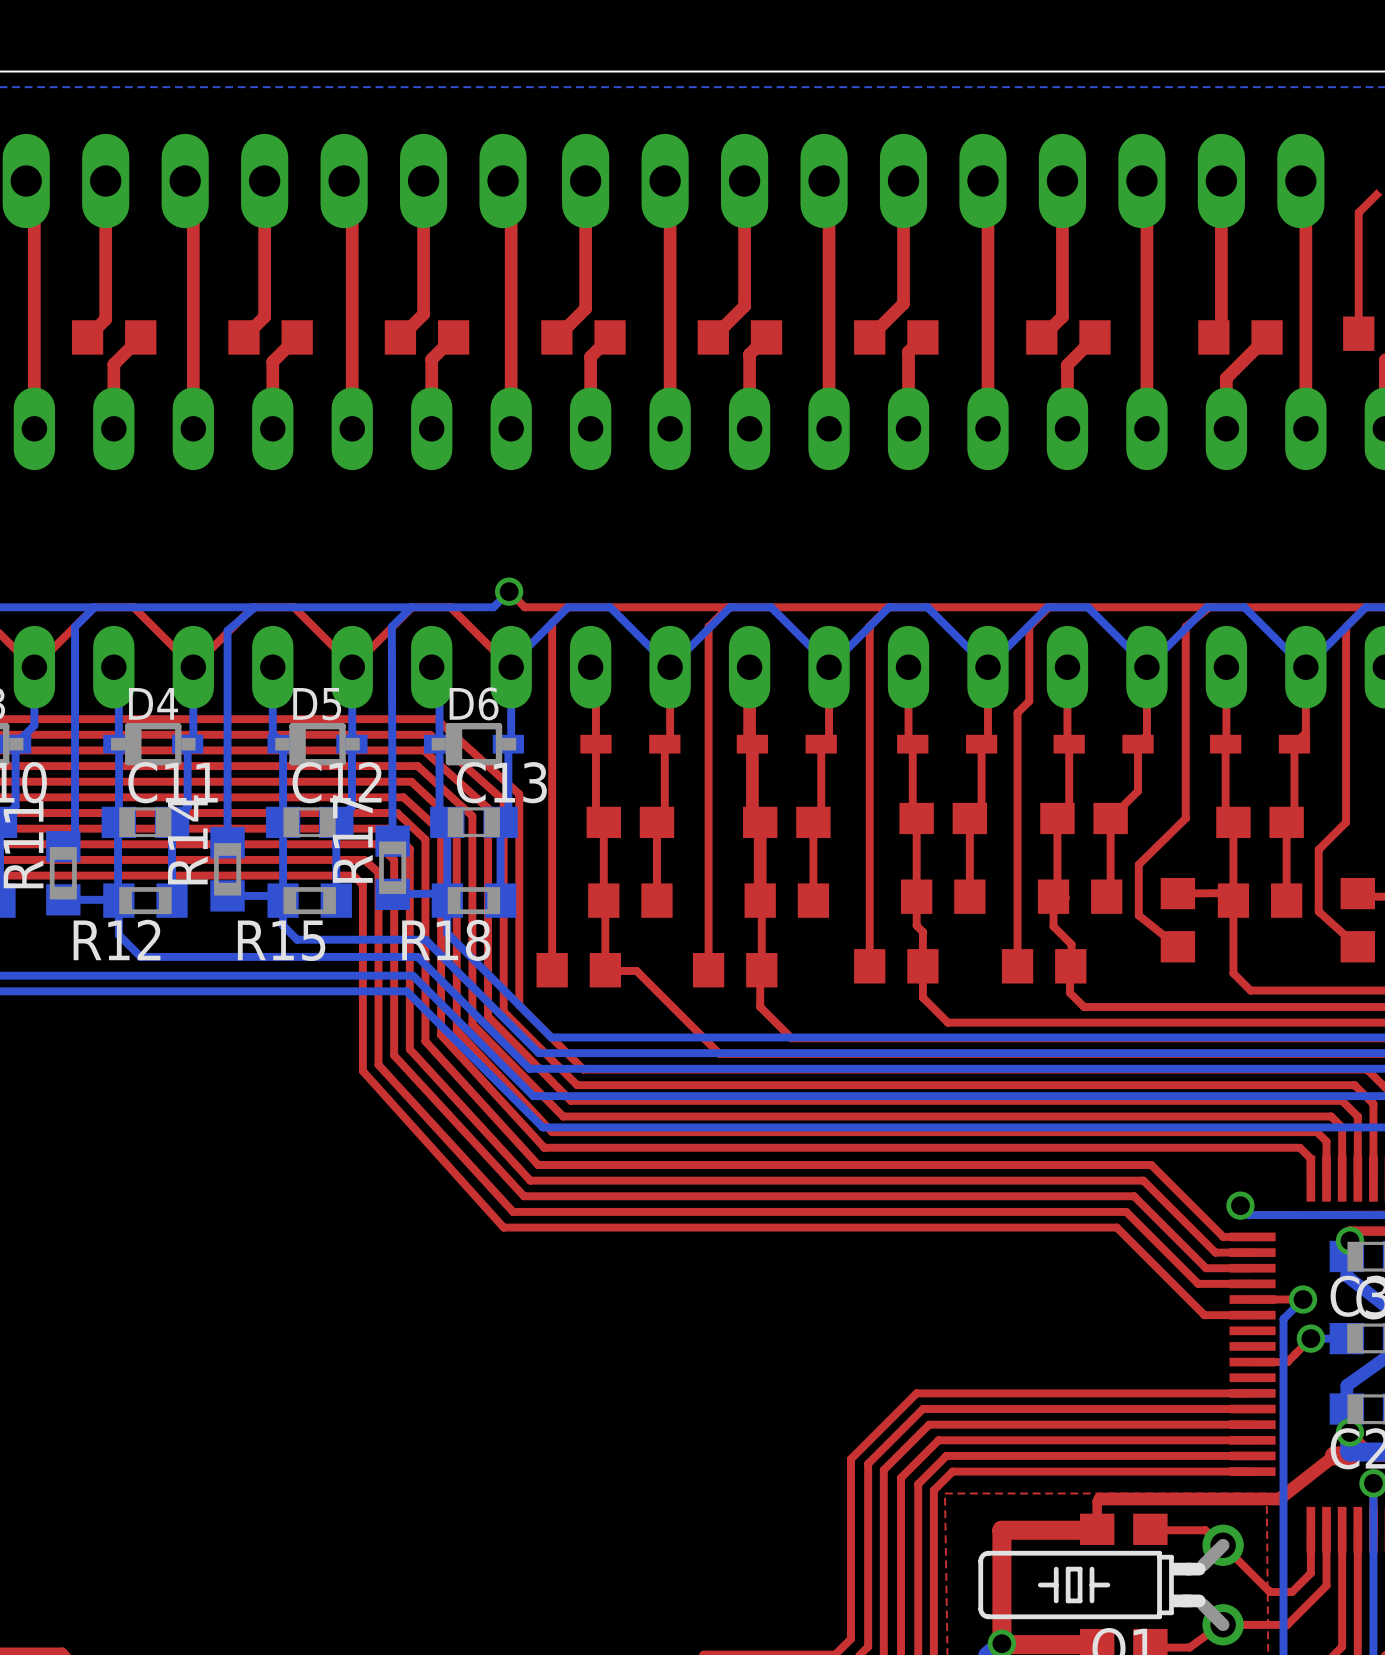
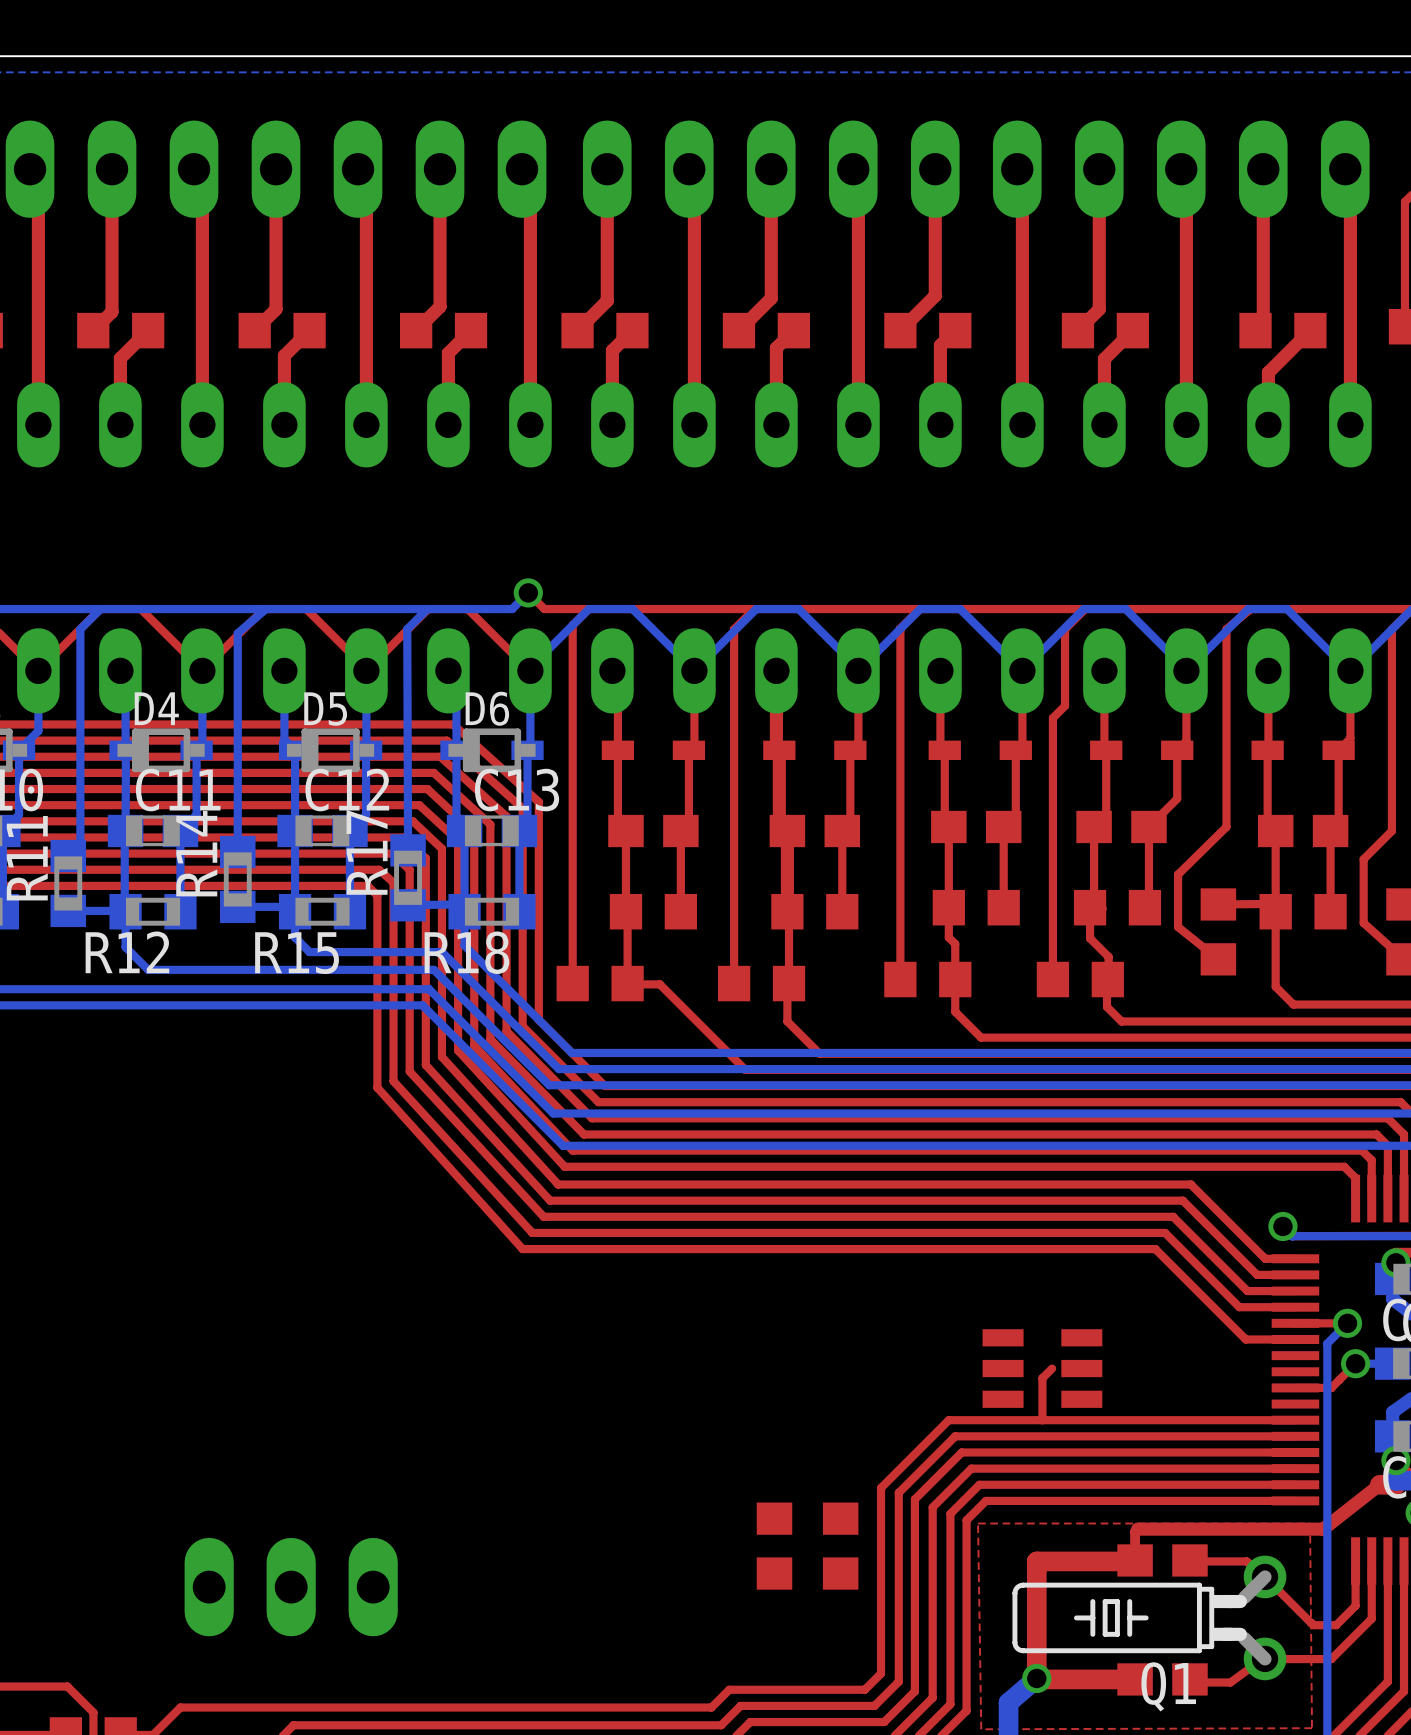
part: none -> (1042, 1368)
top track: none -> (1052, 1368) (1042, 1378) (1042, 1420)
part: none -> (774, 1546)
part: none -> (840, 1546)
part: none -> (291, 1587)

